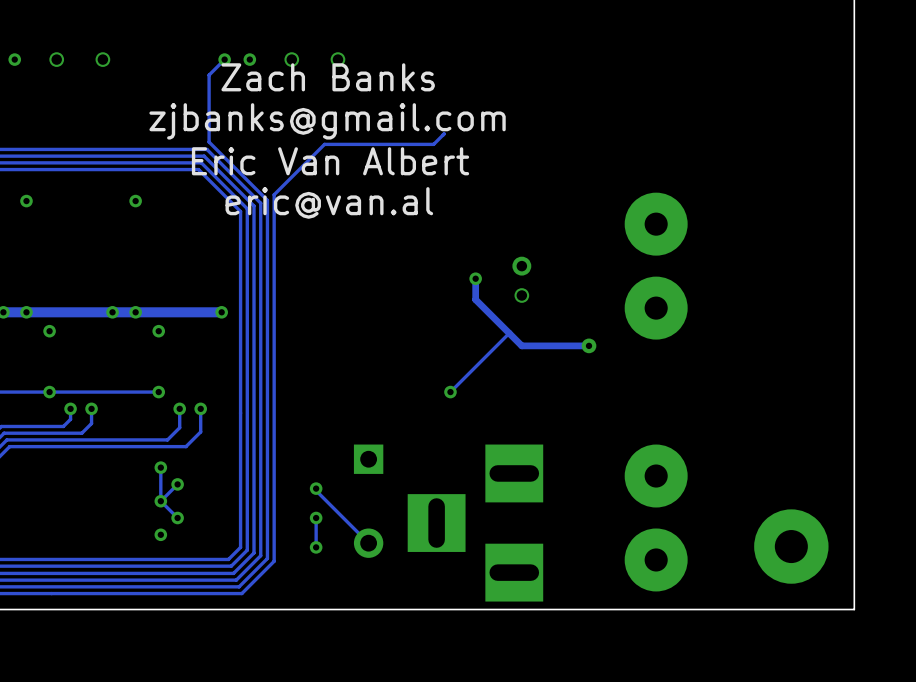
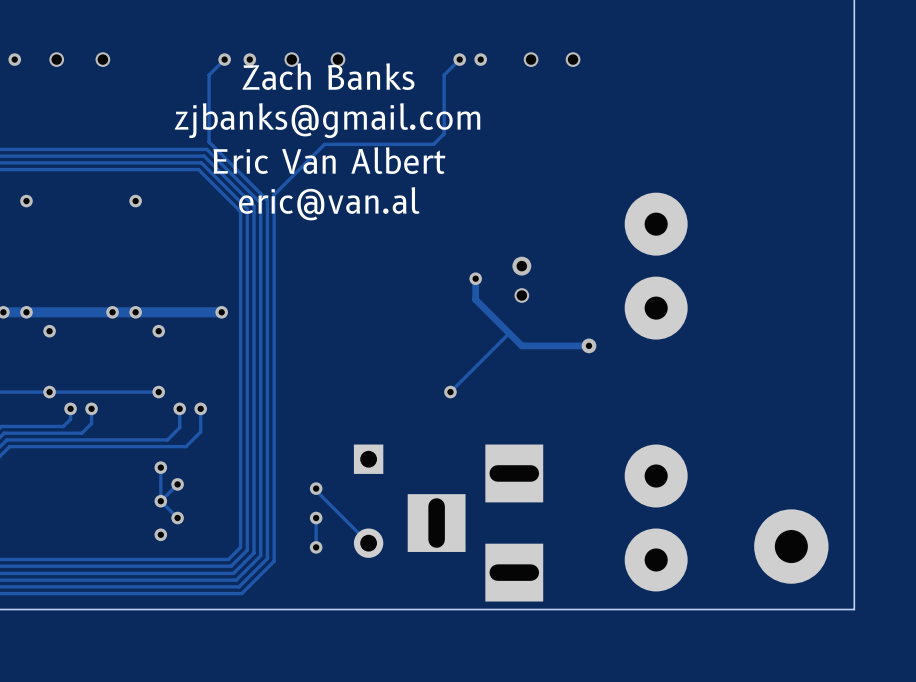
track: none -> (459, 59) (444, 75) (444, 133)
via: none -> (459, 59)
via: none -> (480, 59)
via: none -> (531, 59)
via: none -> (573, 59)

